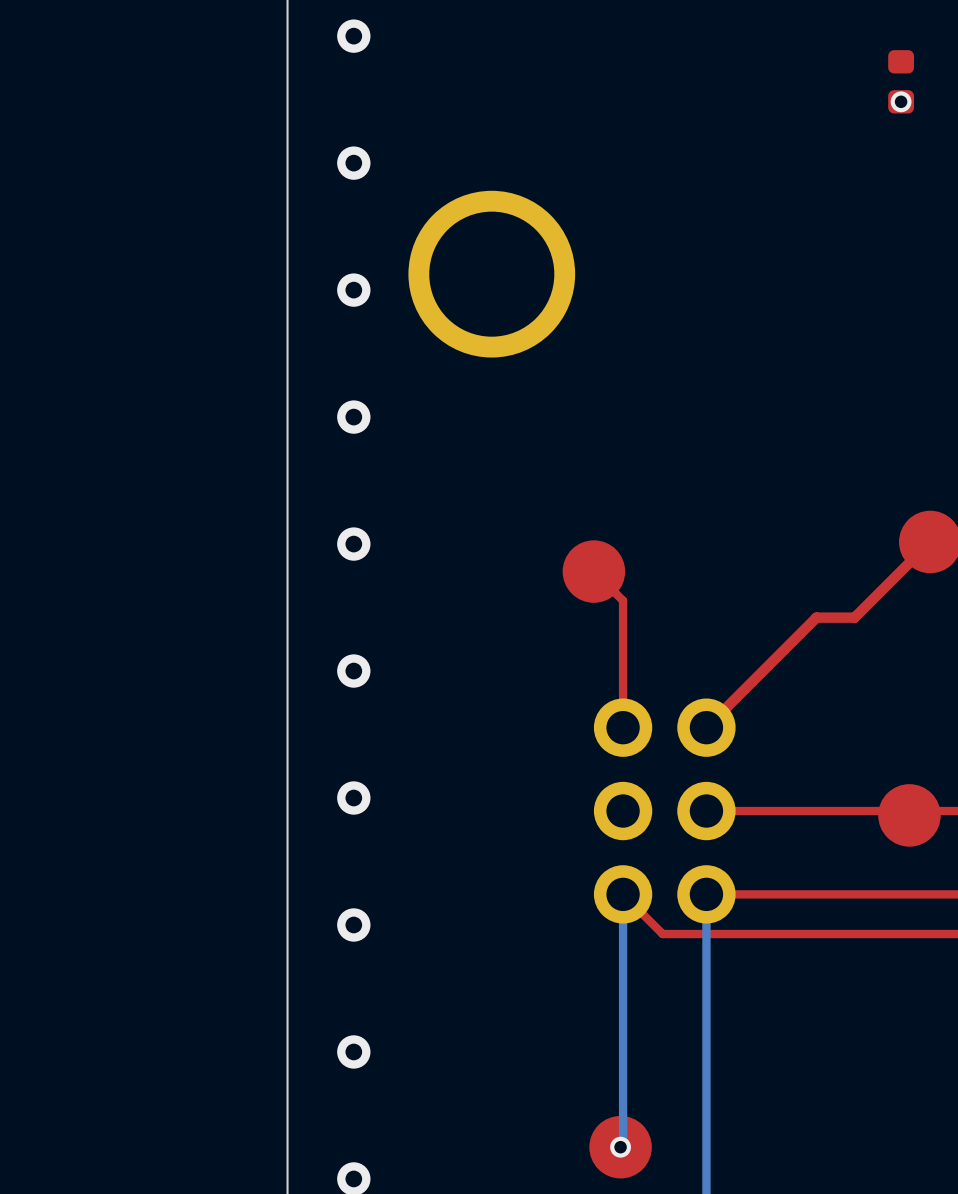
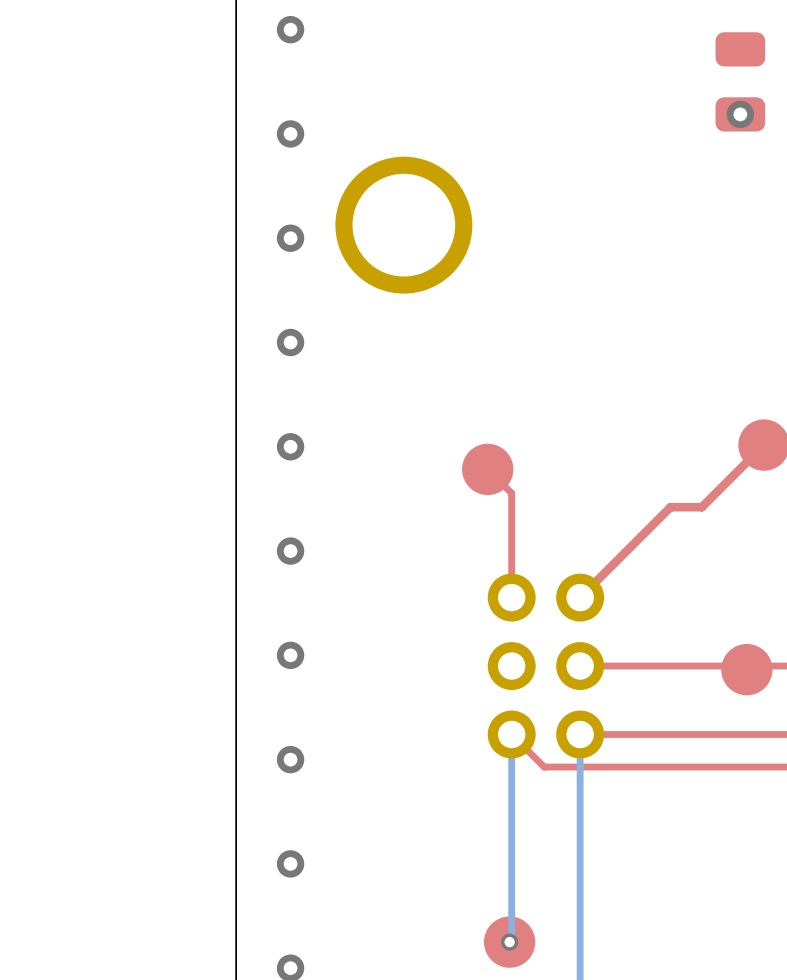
part footprint: [888, 50, 915, 114] -> [715, 32, 766, 132]
via: (901, 101) -> none
via: none -> (740, 114)

